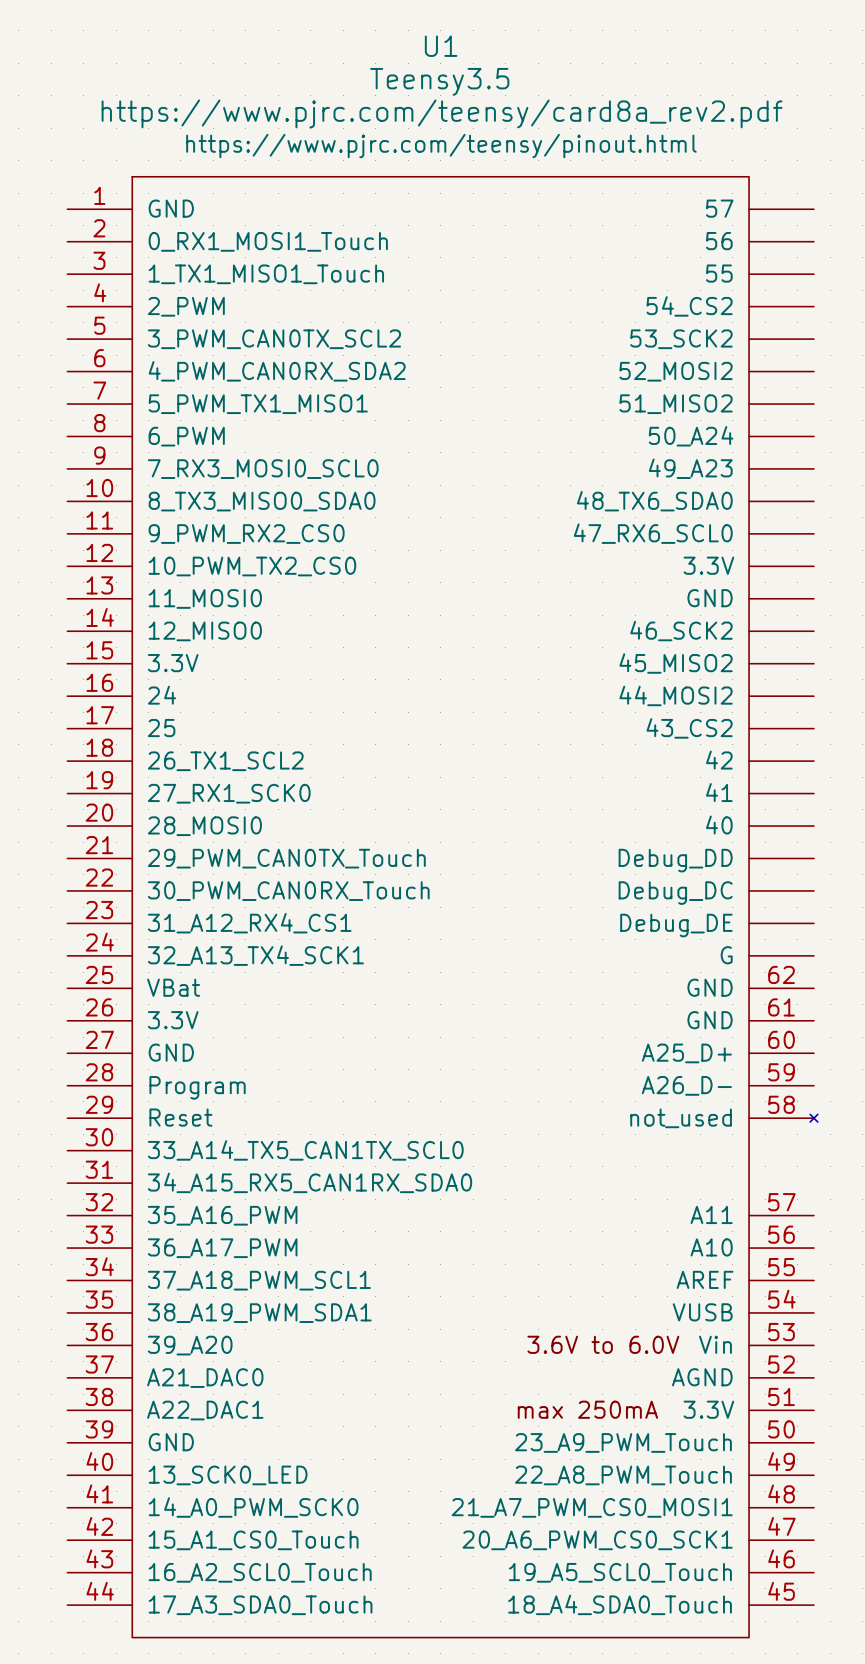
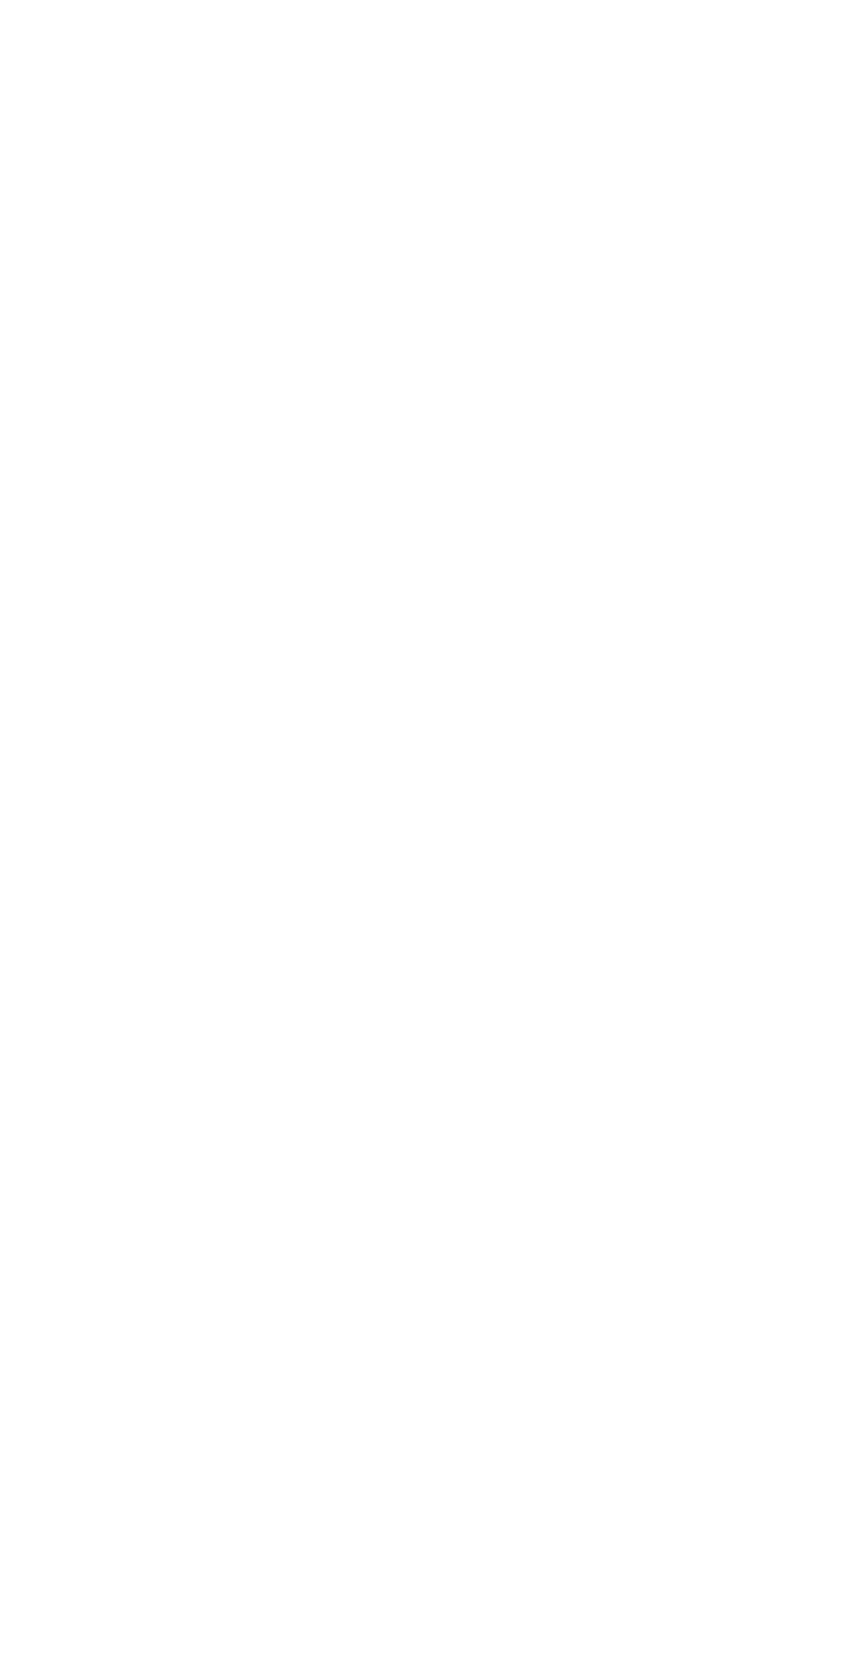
U1: Teensy3.5 (442, 907) -> none

